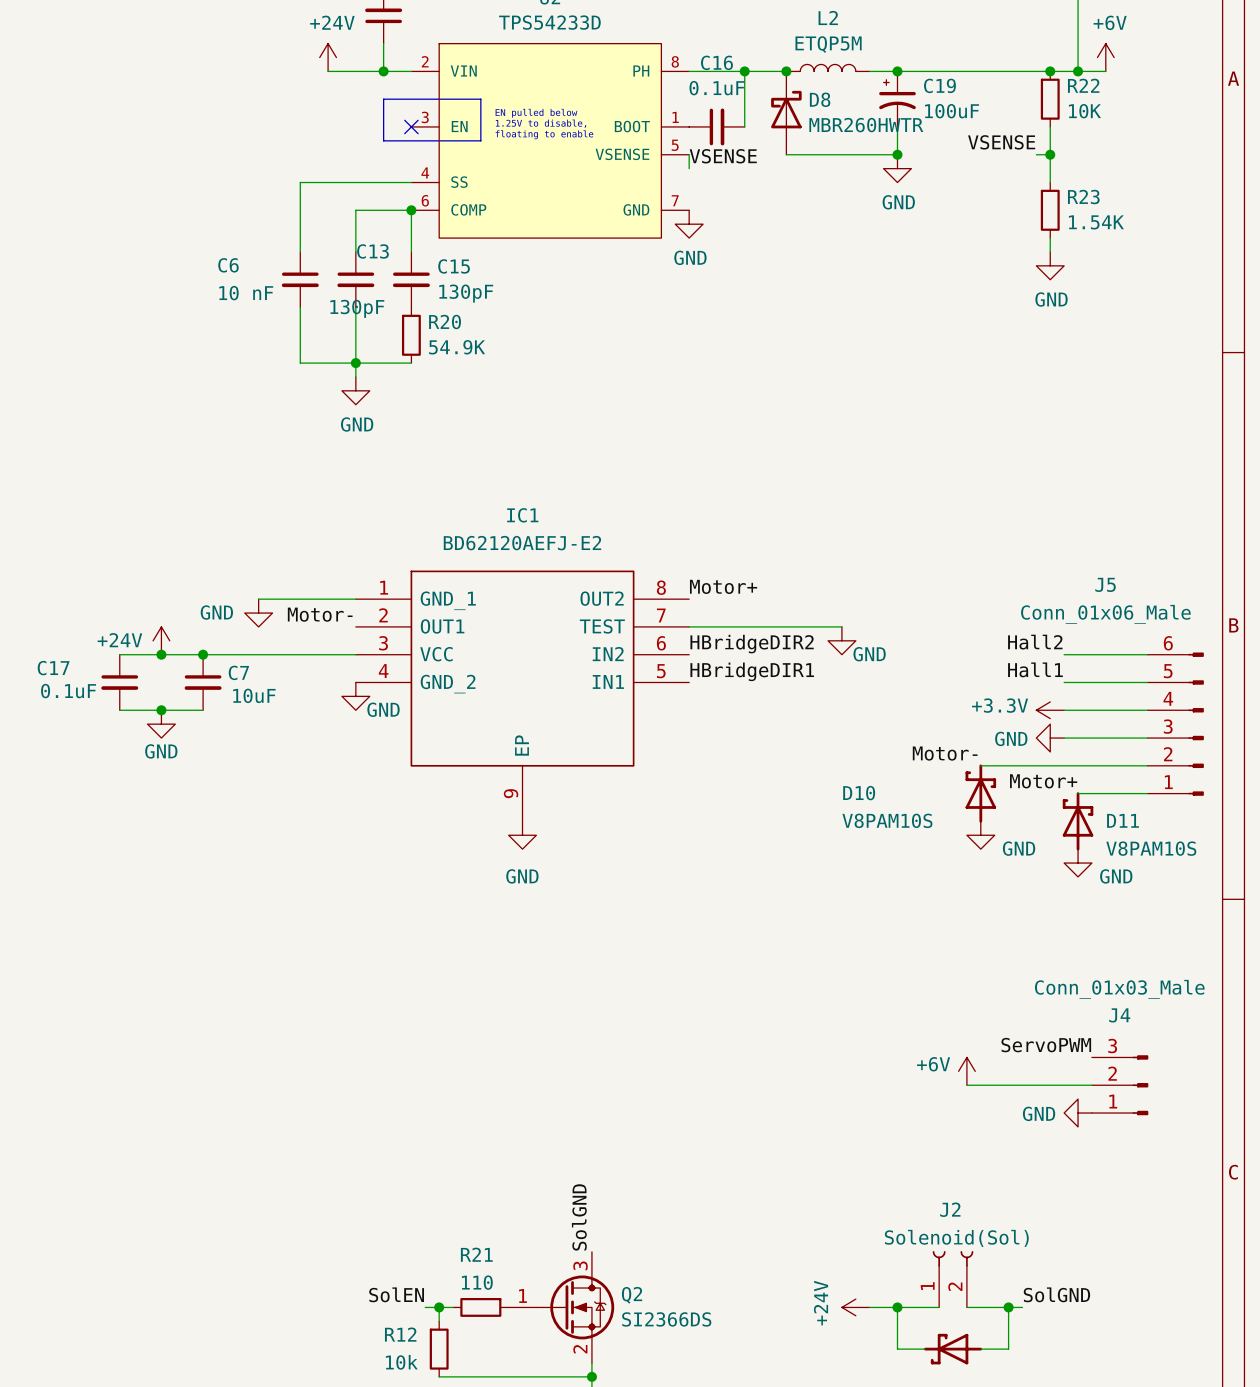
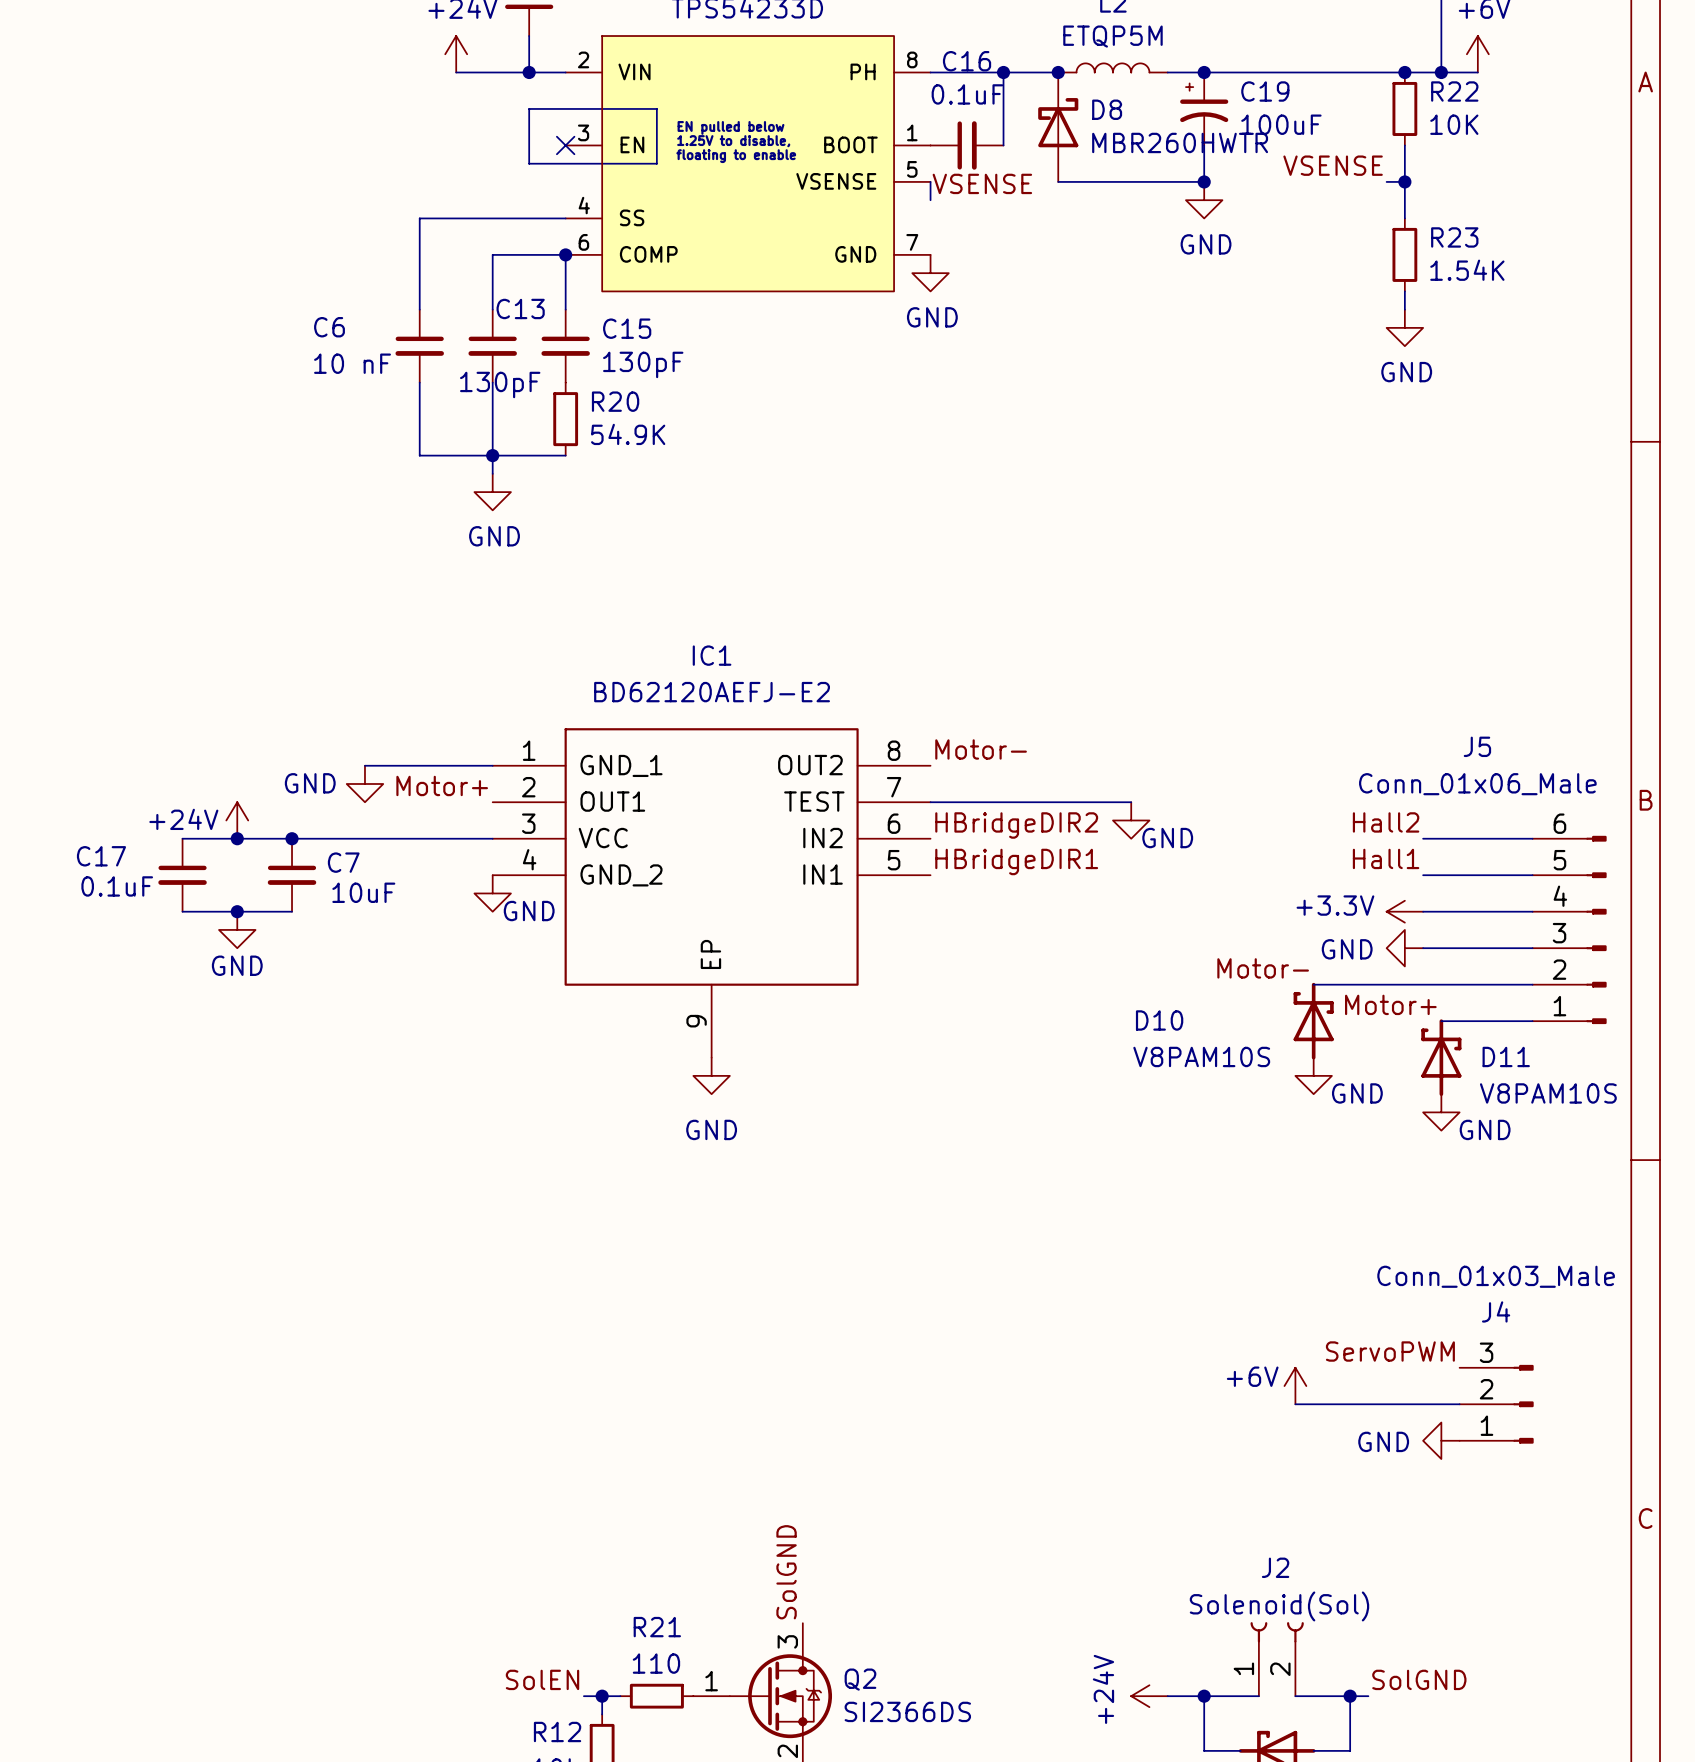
label: Motor+ (723, 586) -> Motor- (981, 749)
label: Motor- (320, 614) -> Motor+ (442, 785)

